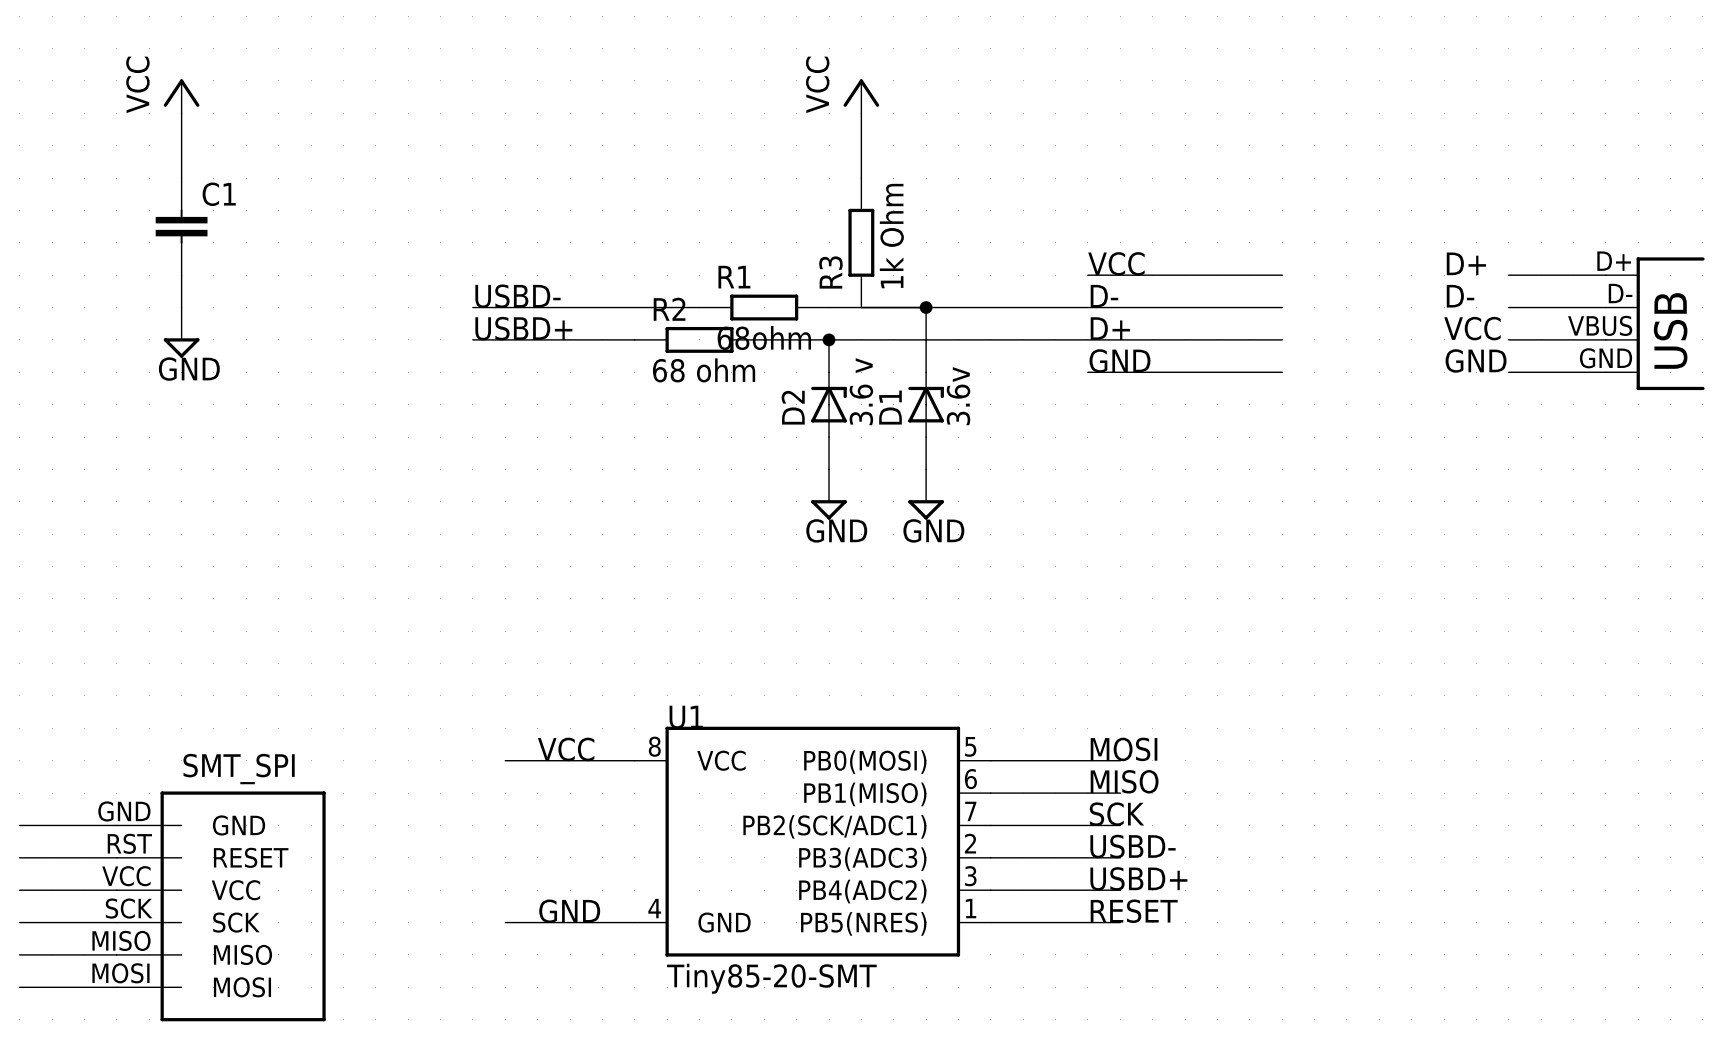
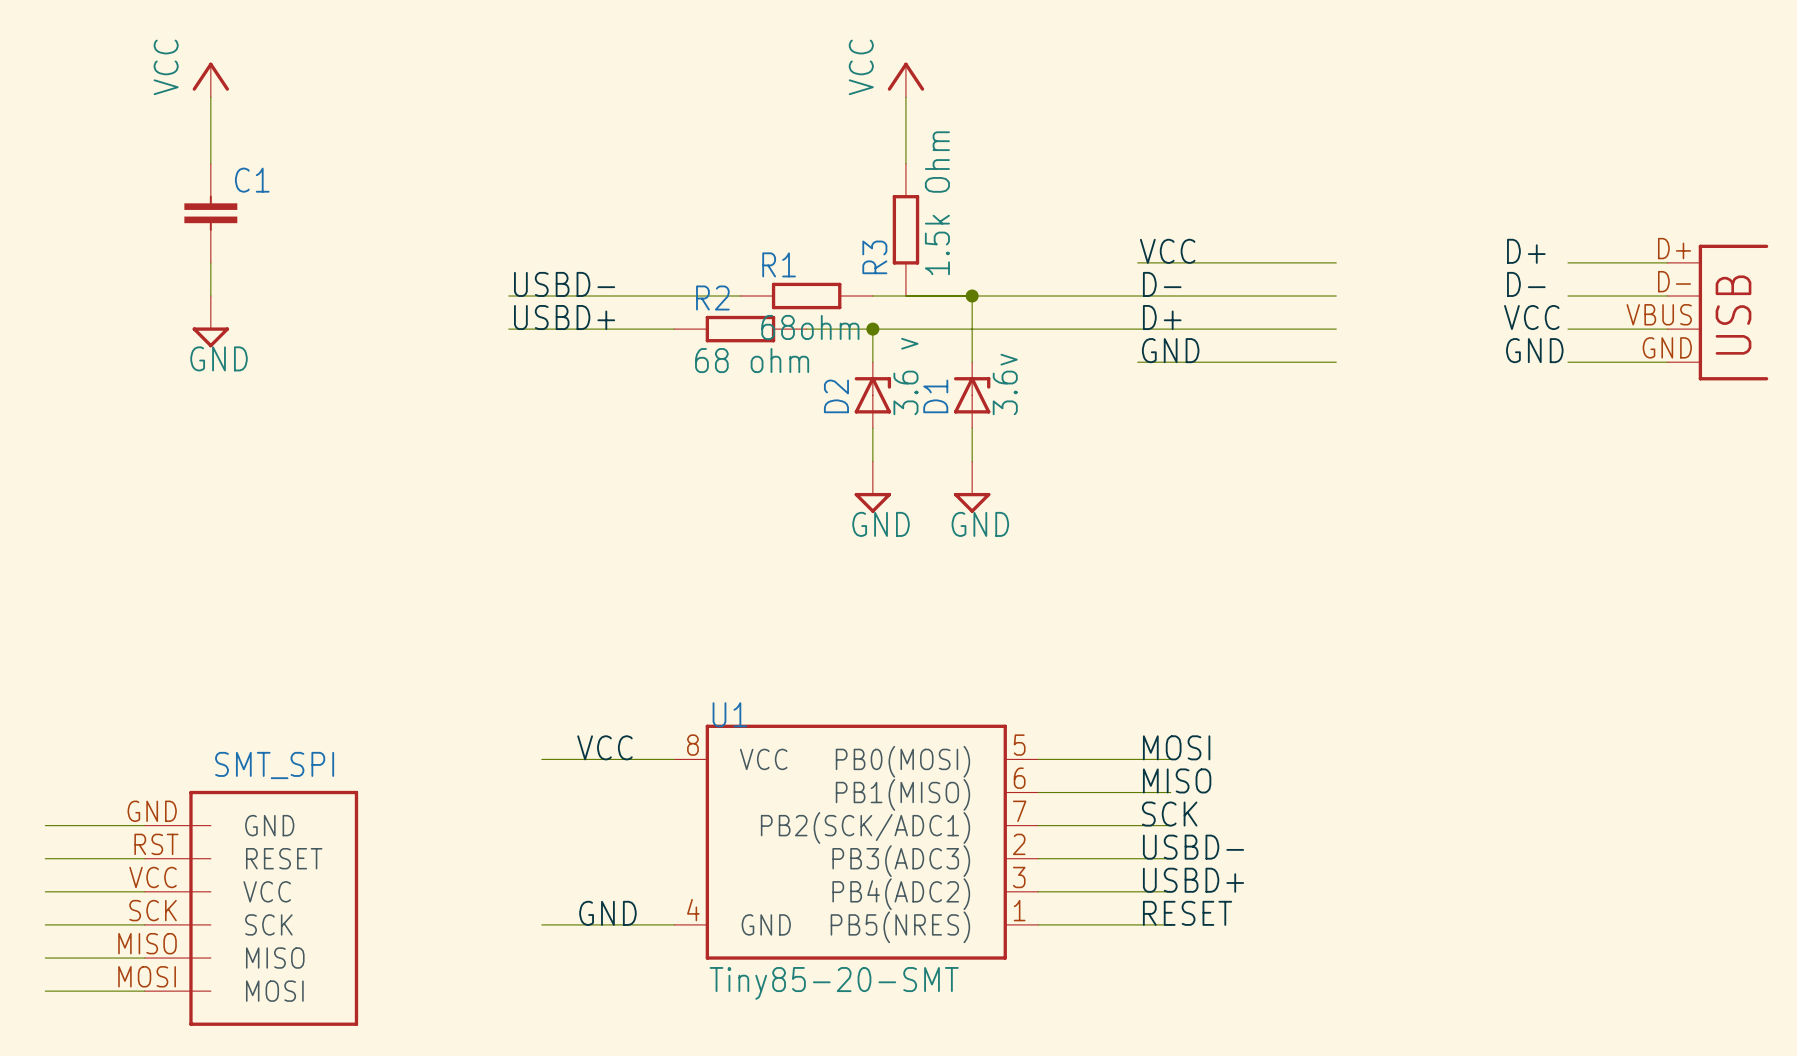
R3 value: 1k Ohm (891, 236) -> 1.5k Ohm (937, 203)

